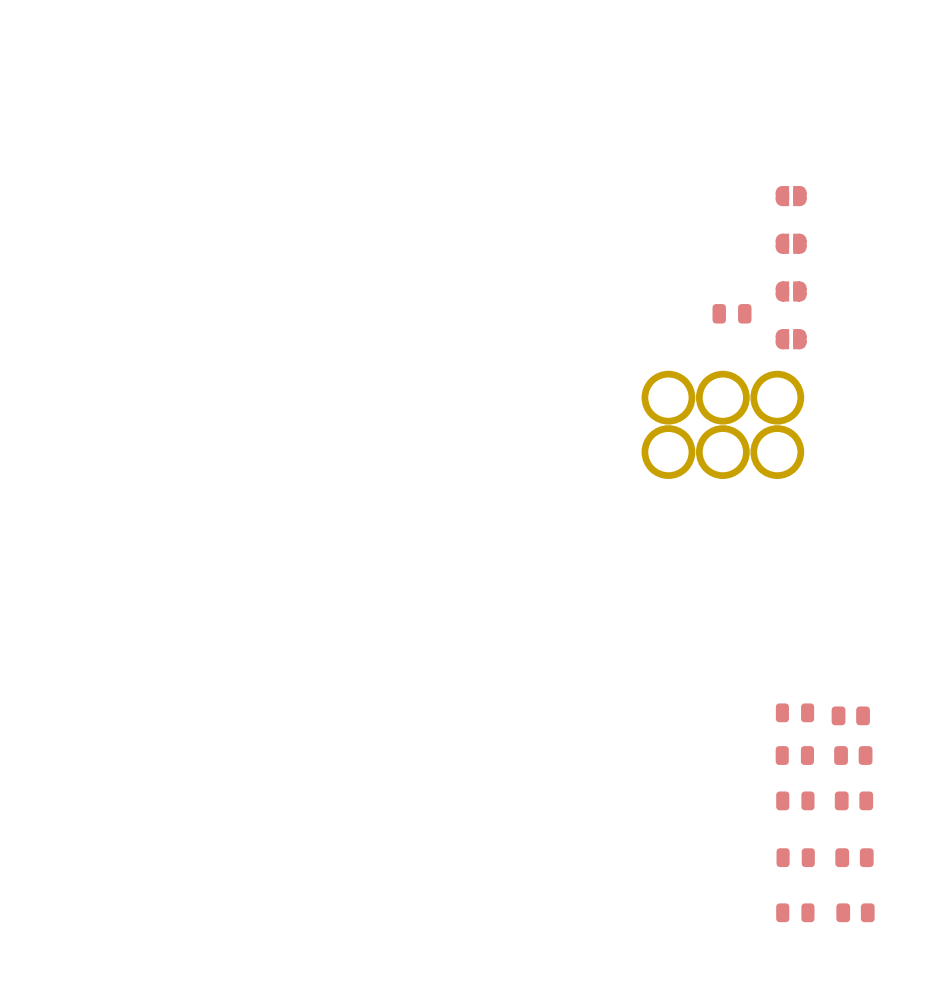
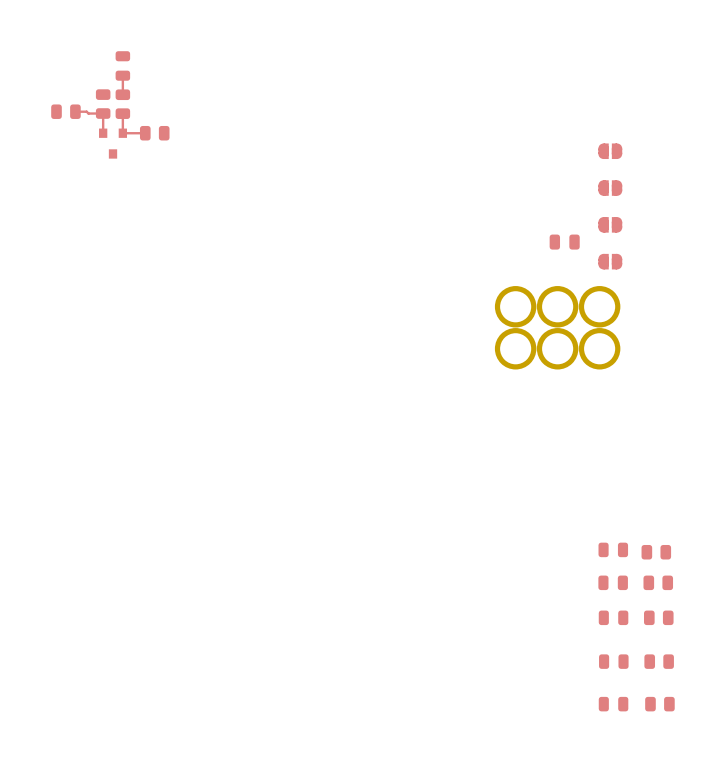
part: none -> (122, 65)
top track: none -> (122, 75) (122, 94)
part: none -> (103, 104)
part: none -> (122, 104)
part: none -> (65, 111)
top track: none -> (75, 111) (103, 113) (103, 133)
top track: none -> (122, 113) (122, 133) (145, 133)
part: none -> (154, 133)
part: none -> (113, 143)

